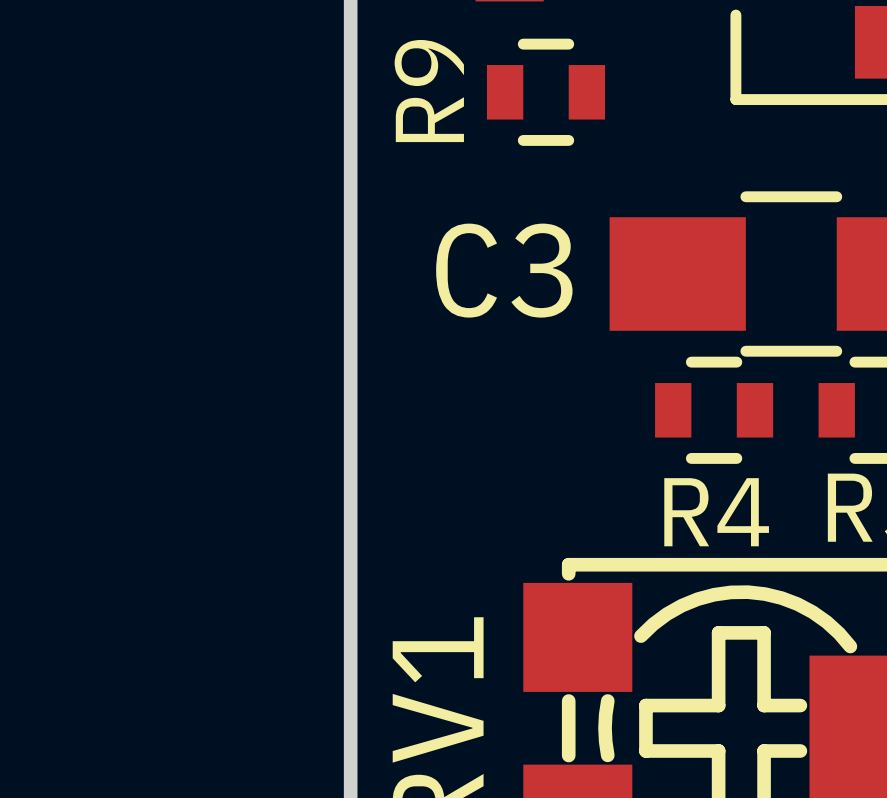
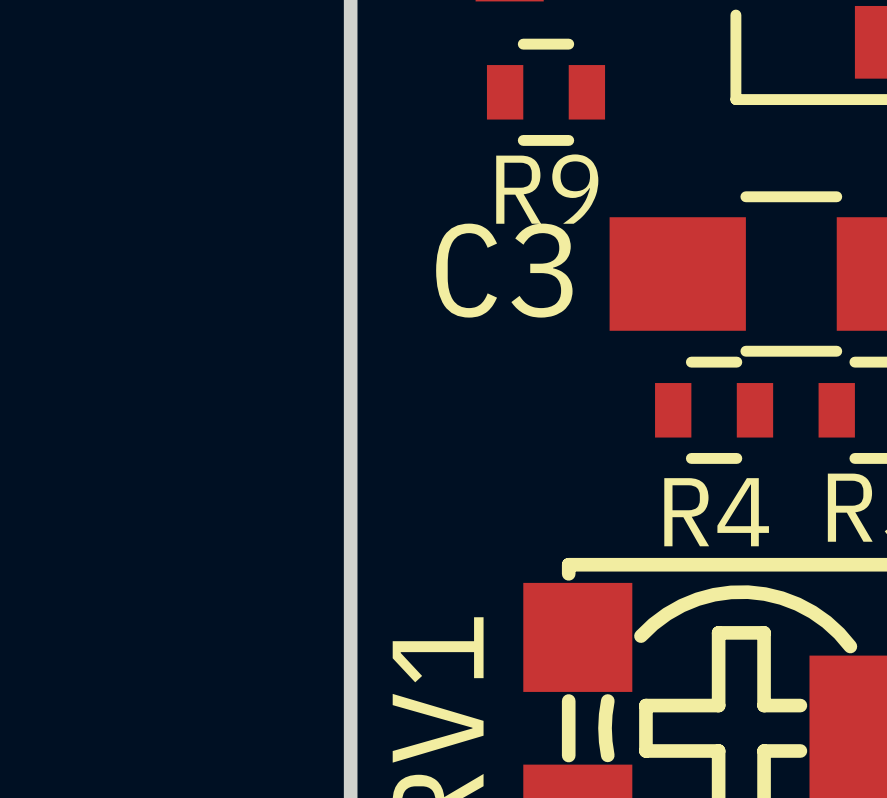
R9 name rotation: 0° (429, 91) -> 90° clockwise (547, 189)

